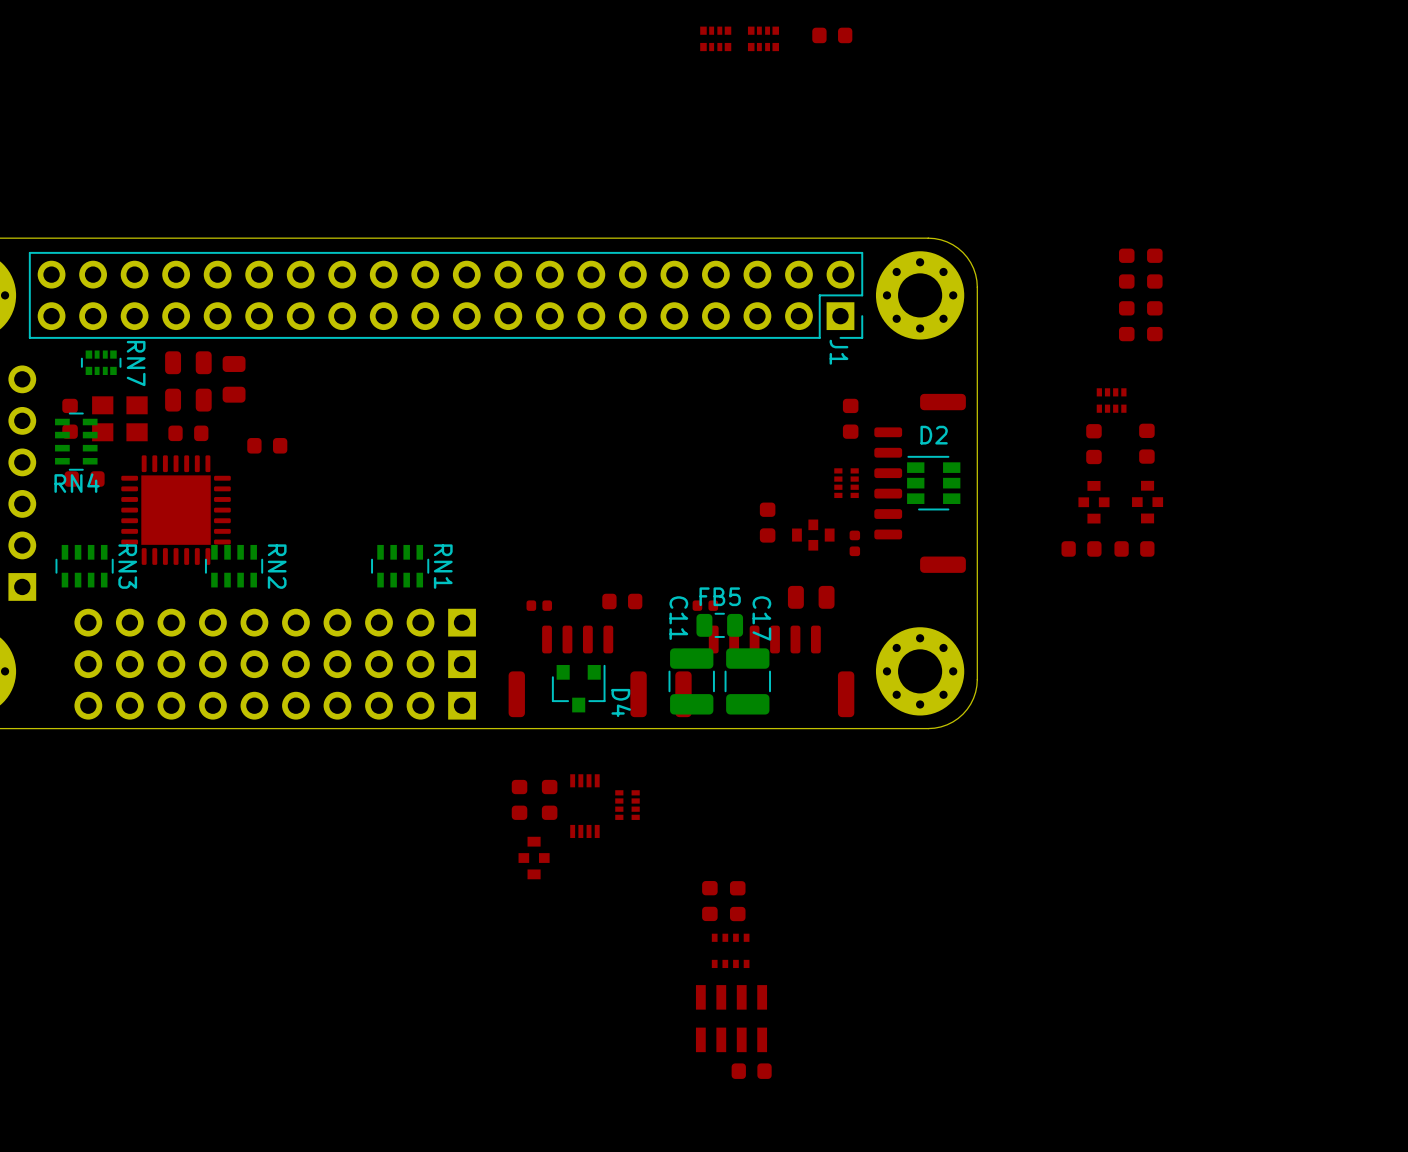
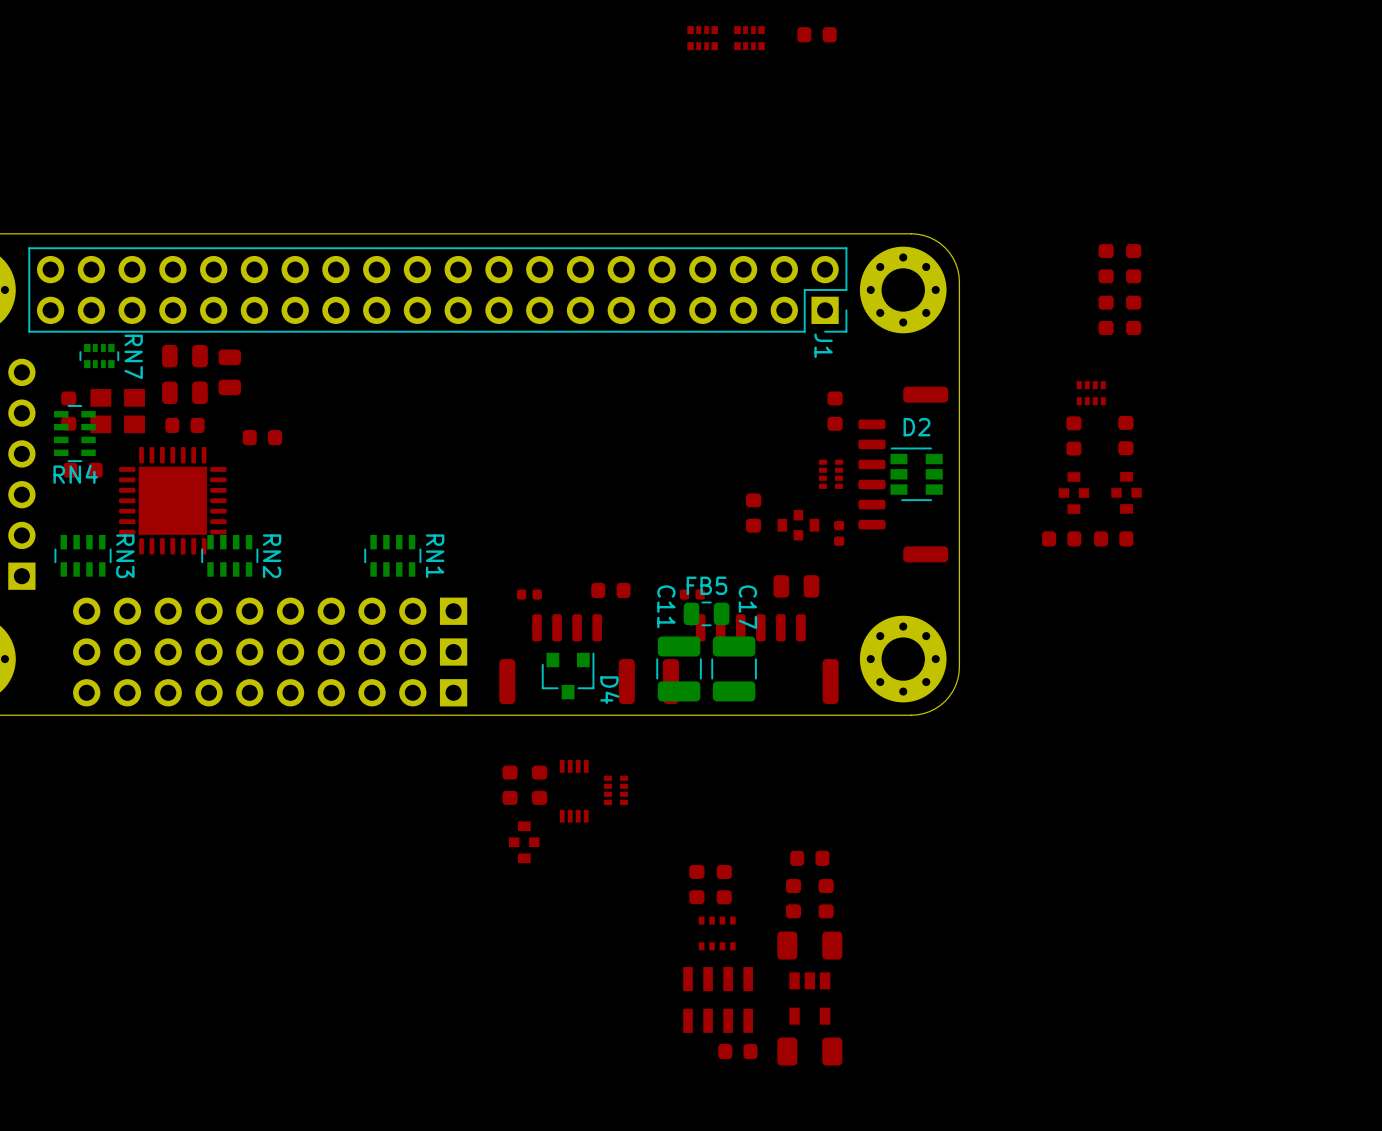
part: none -> (809, 858)
part: none -> (793, 898)
part: none -> (826, 898)
part: none -> (809, 945)
part: none -> (809, 998)
part: none -> (809, 1051)

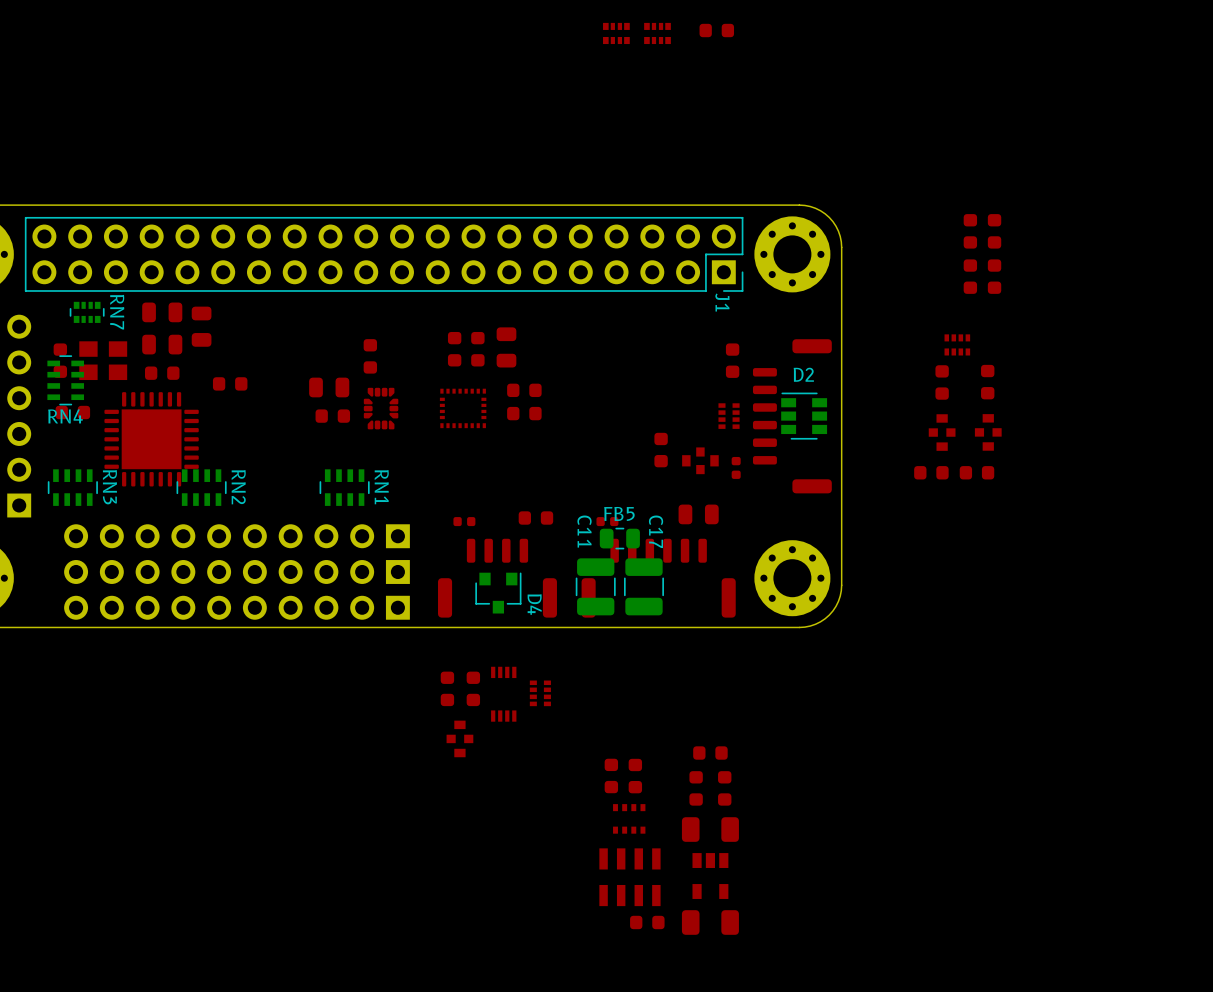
part: none -> (506, 347)
part: none -> (454, 349)
part: none -> (477, 349)
part: none -> (370, 356)
part: none -> (329, 387)
part: none -> (524, 390)
part: none -> (381, 408)
part: none -> (463, 408)
part: none -> (524, 413)
part: none -> (332, 416)

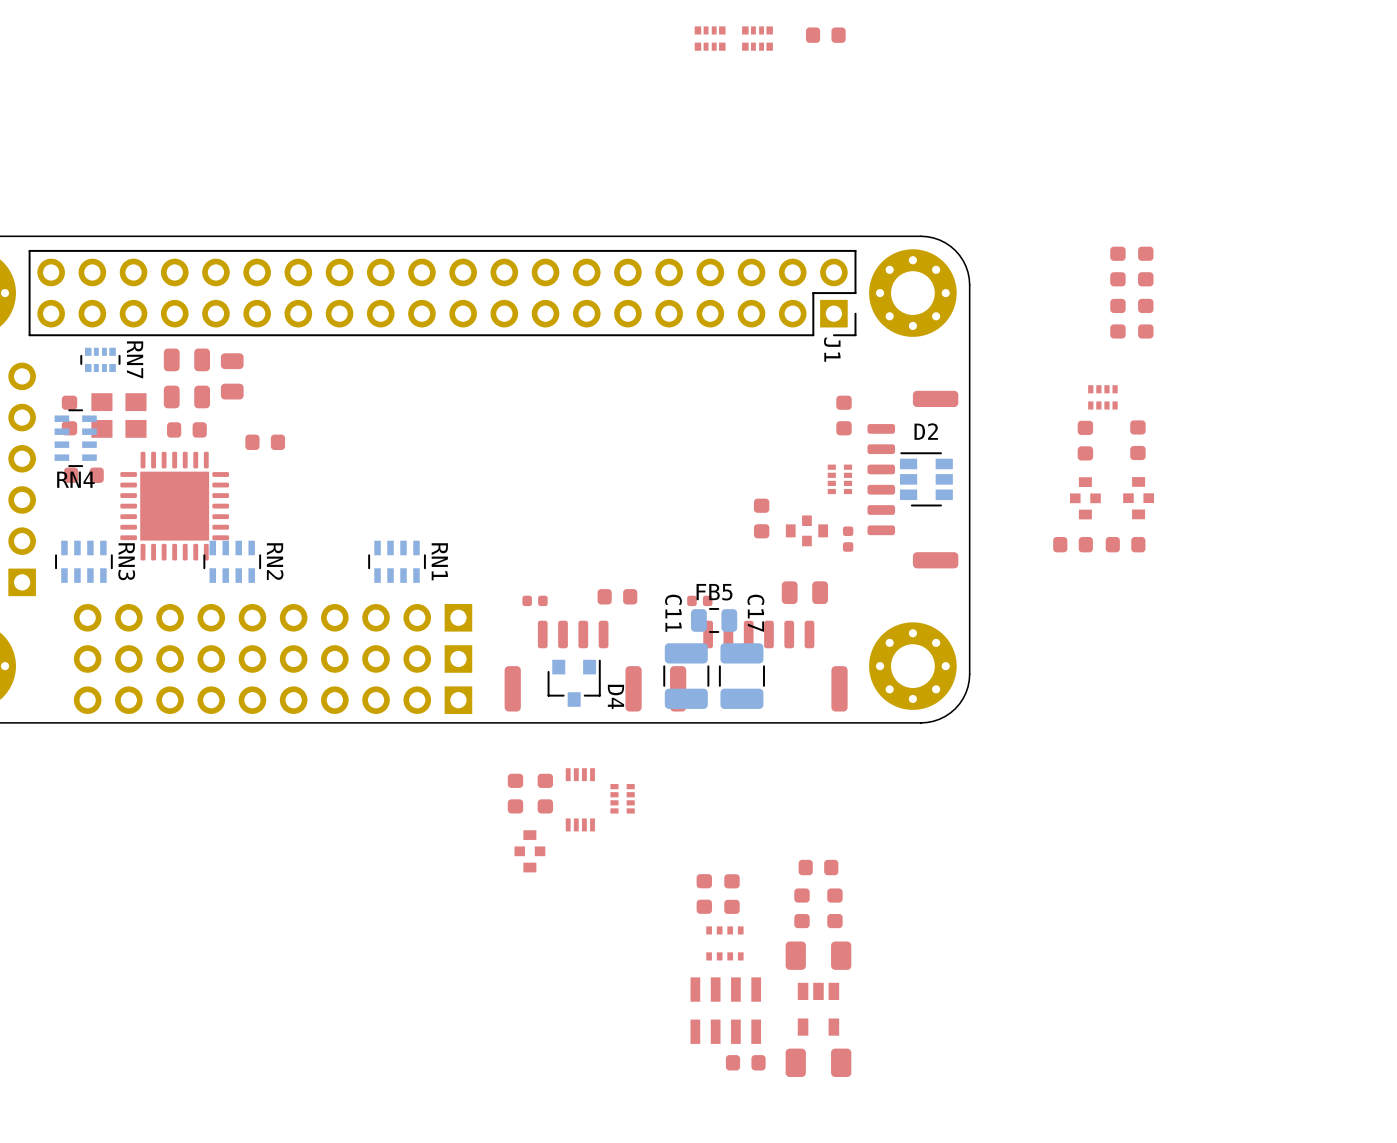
part: (506, 347) -> none
part: (454, 349) -> none
part: (477, 349) -> none
part: (370, 356) -> none
part: (329, 387) -> none
part: (524, 390) -> none
part: (381, 408) -> none
part: (463, 408) -> none
part: (524, 413) -> none
part: (332, 416) -> none

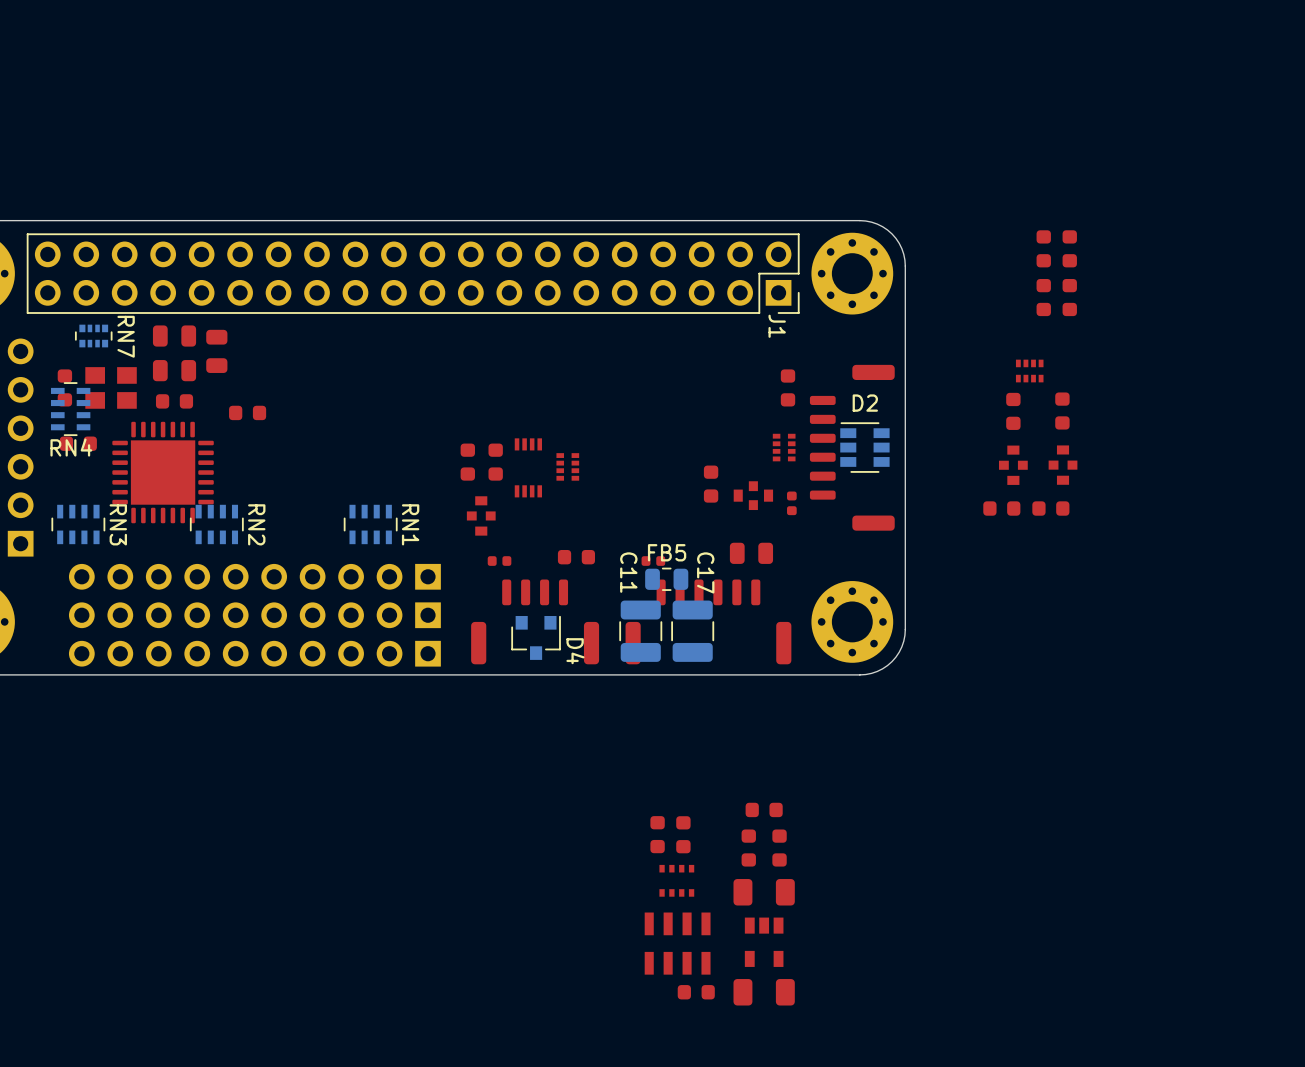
part: (825, 35) -> none
part: (710, 38) -> none
part: (757, 38) -> none
part: none -> (467, 462)
part: none -> (495, 462)
part: (515, 793) -> none
part: (545, 793) -> none
part position: (622, 798) -> (567, 466)
part position: (580, 799) -> (528, 467)
part position: (529, 851) -> (481, 515)

